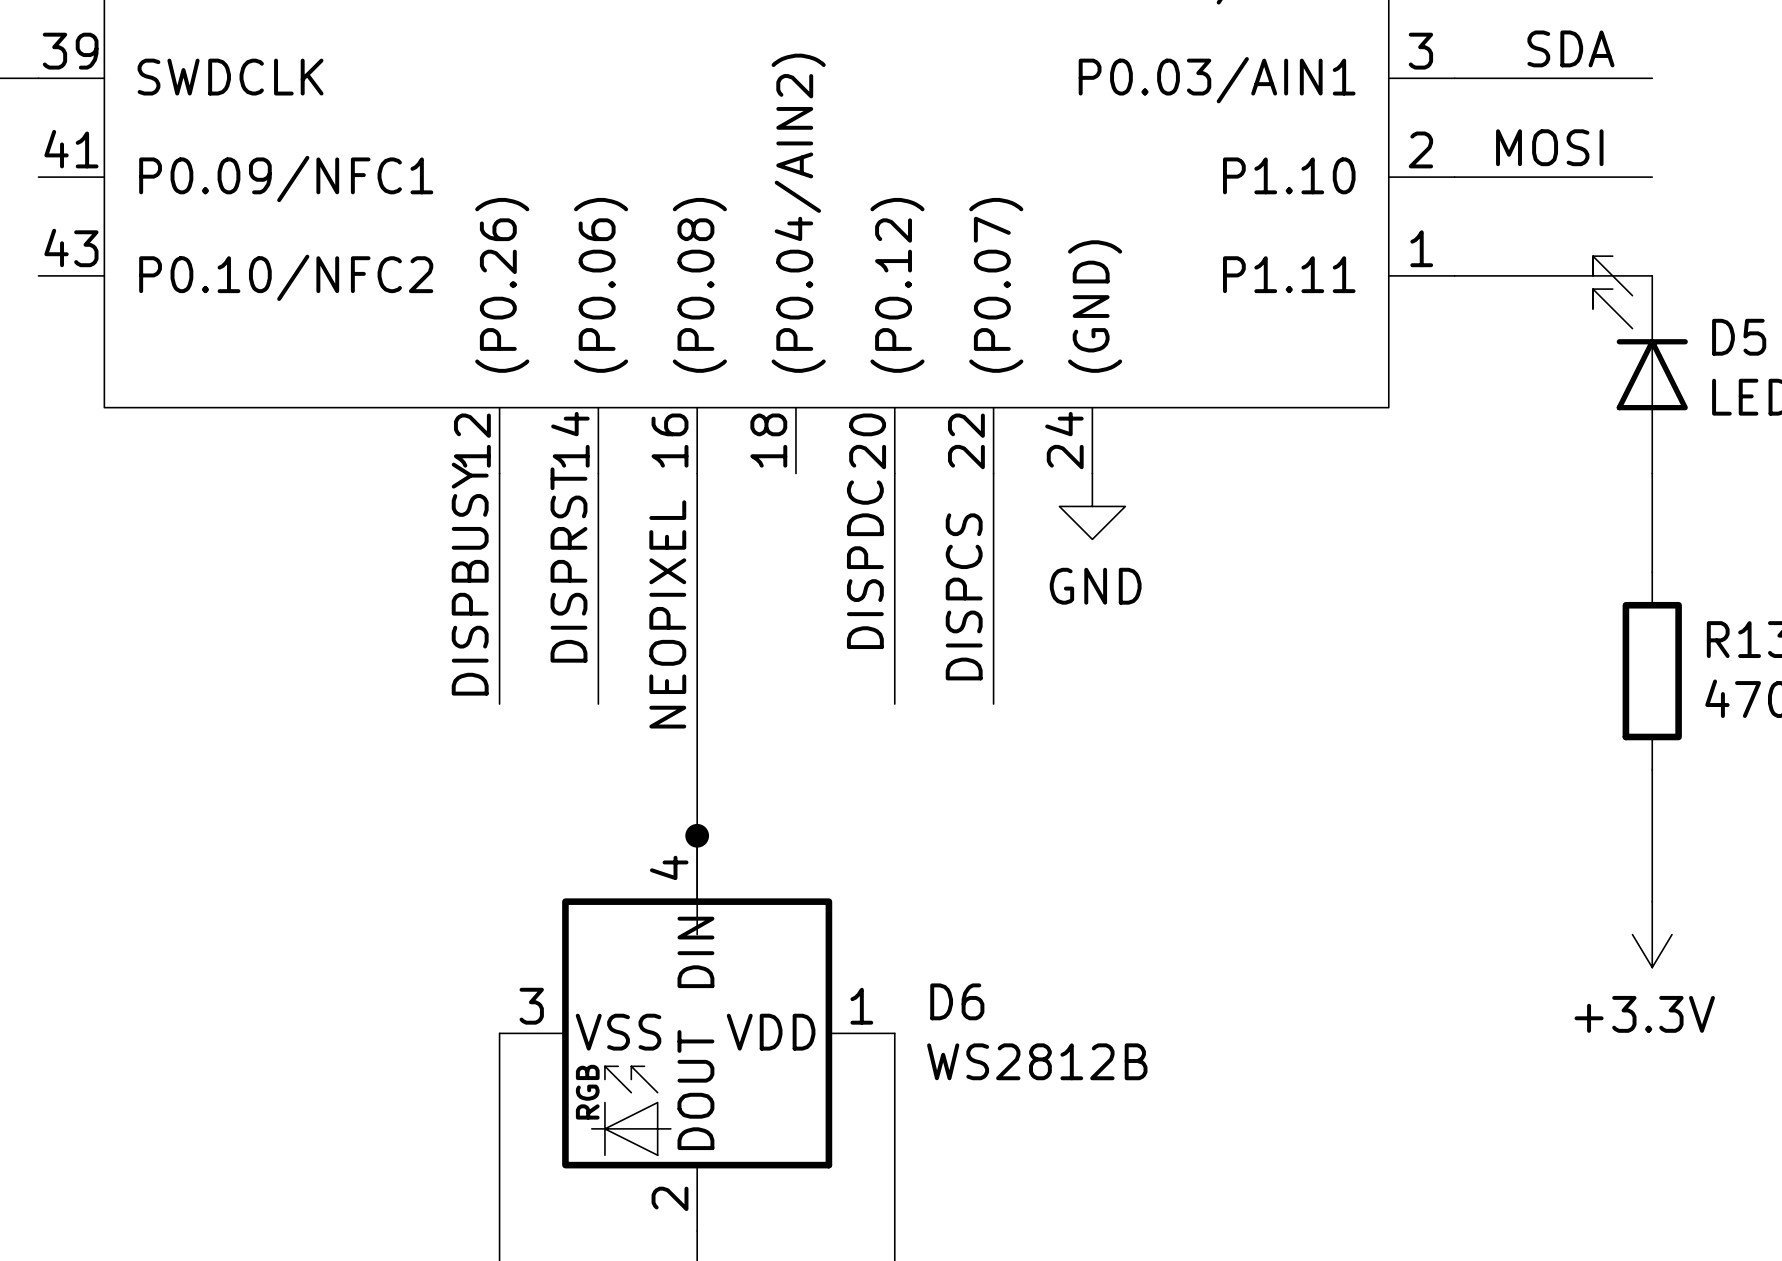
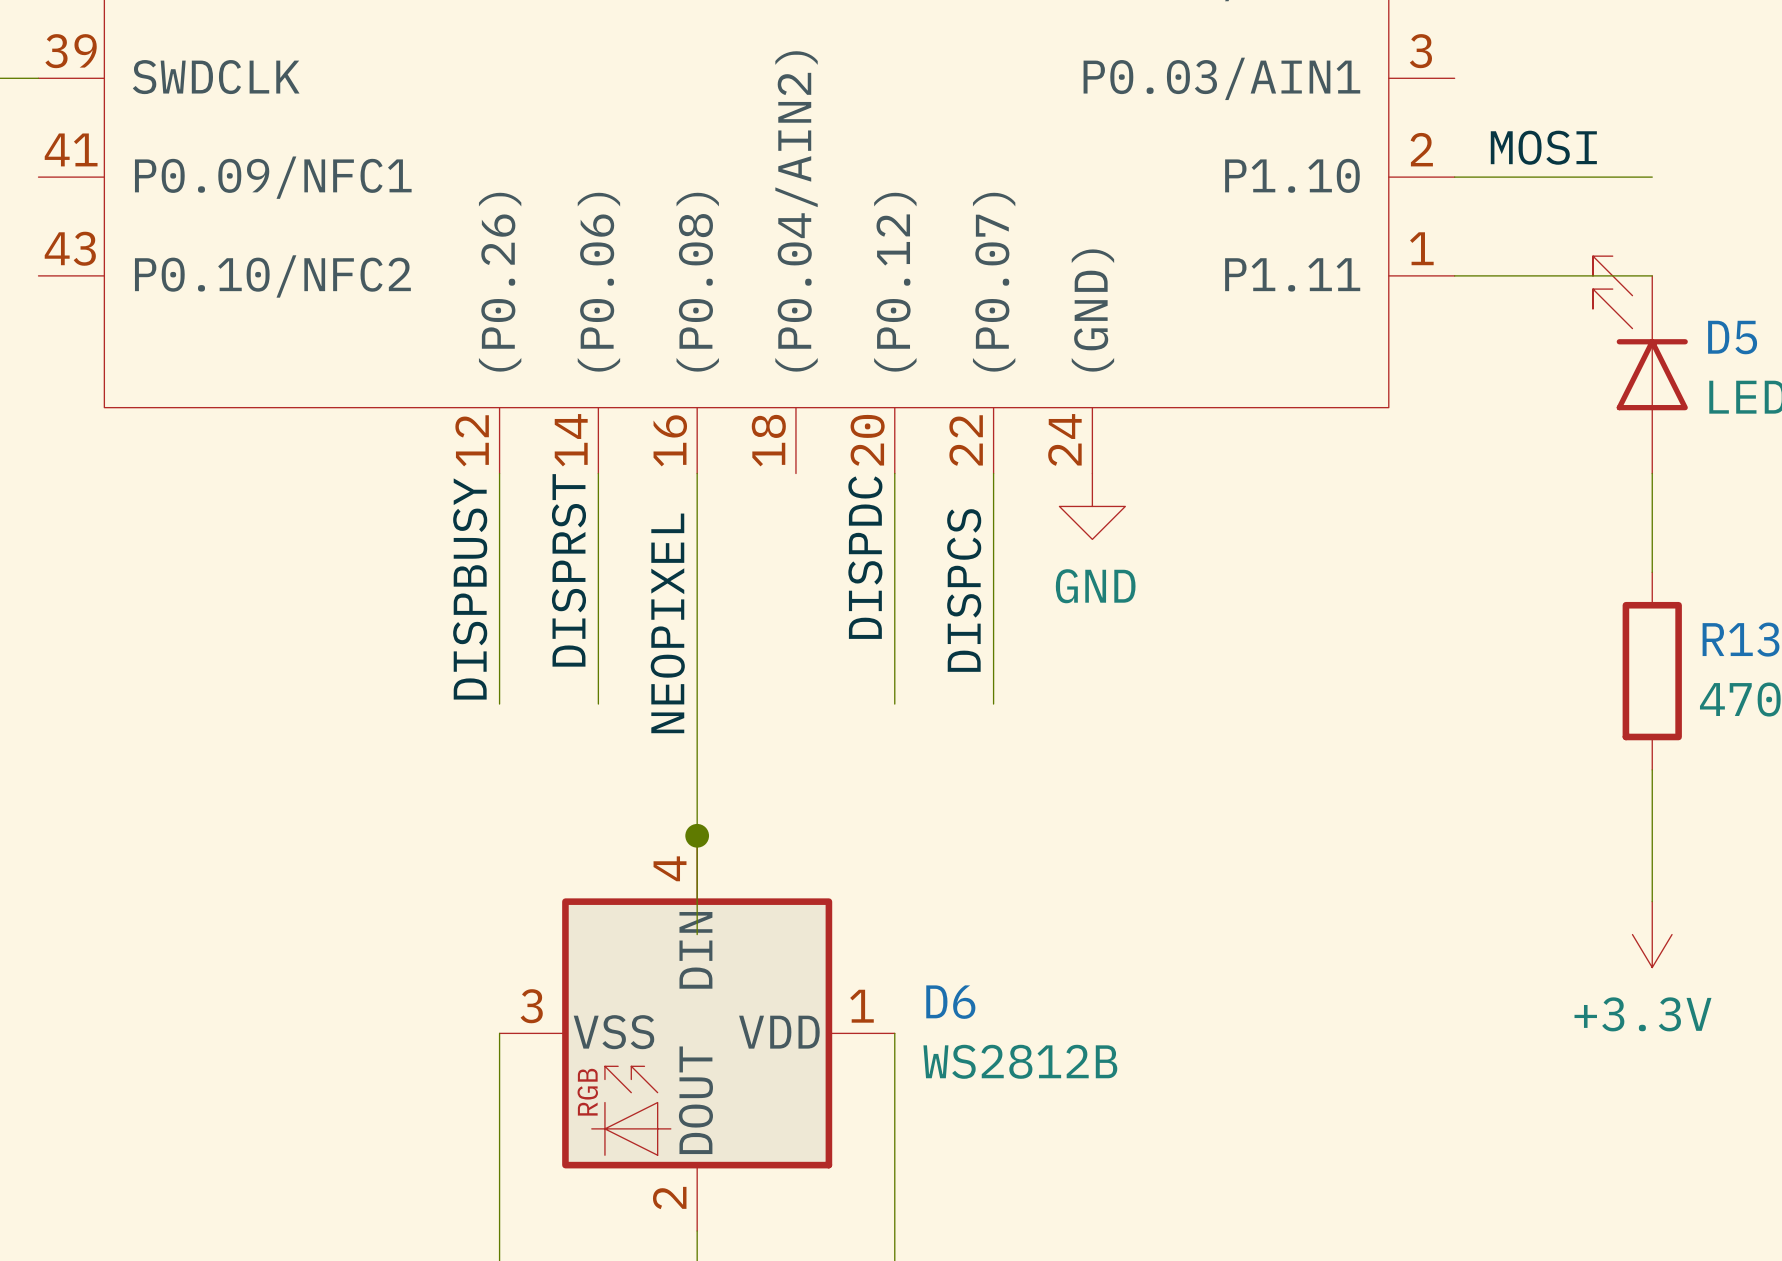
label: SDA (1570, 48) -> none
wire: (1454, 78) (1652, 78) -> none

